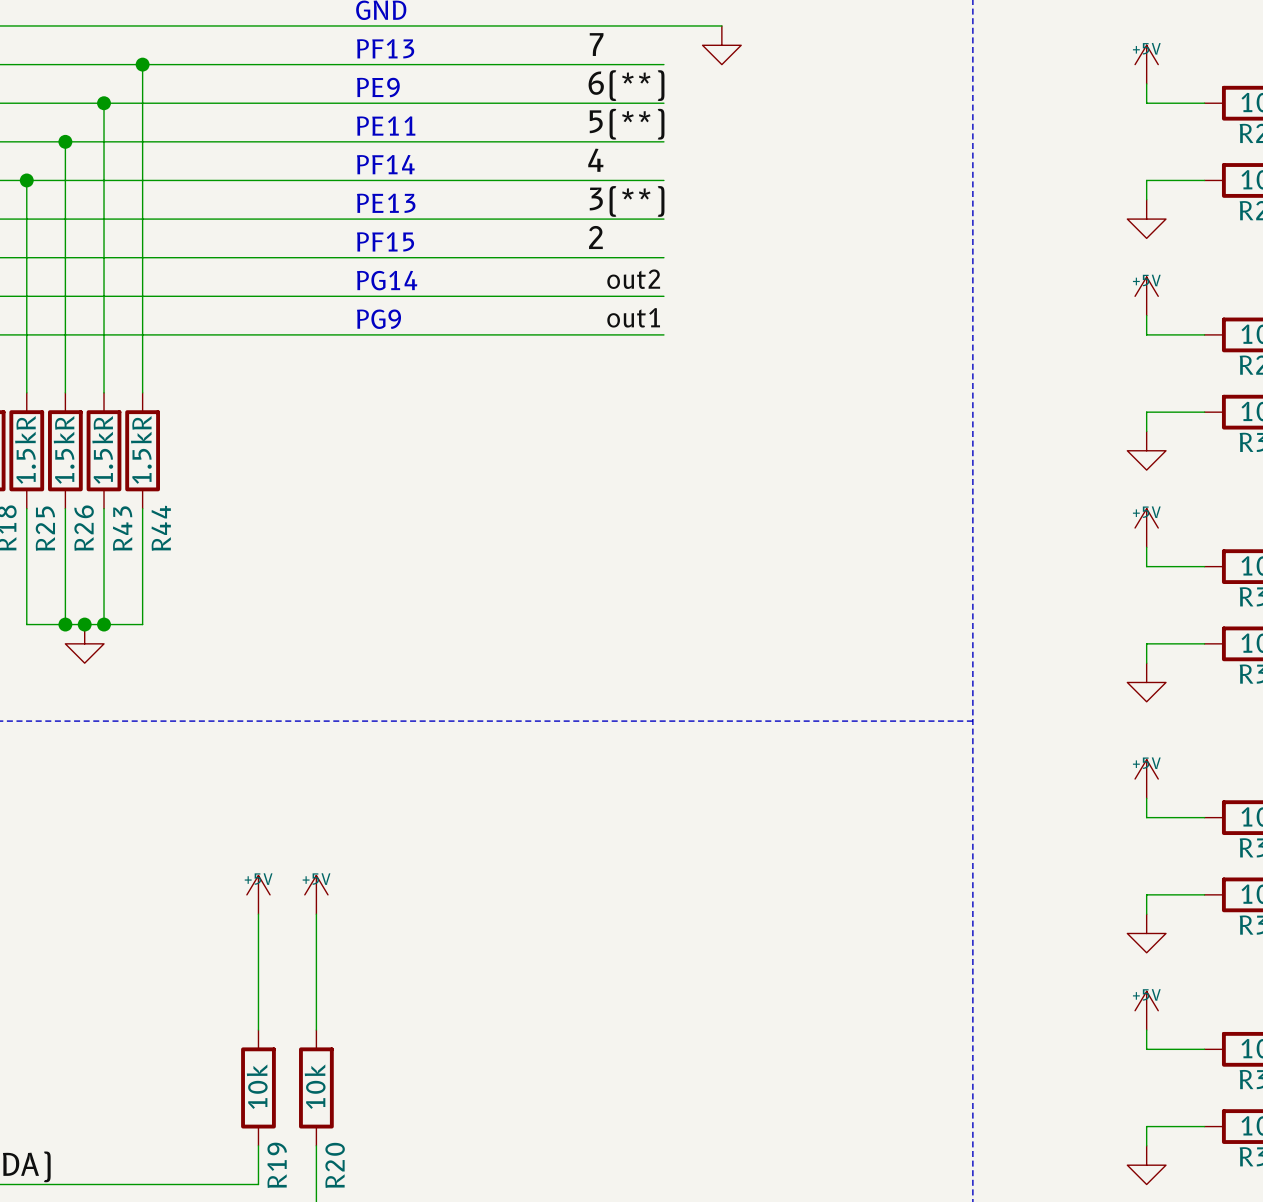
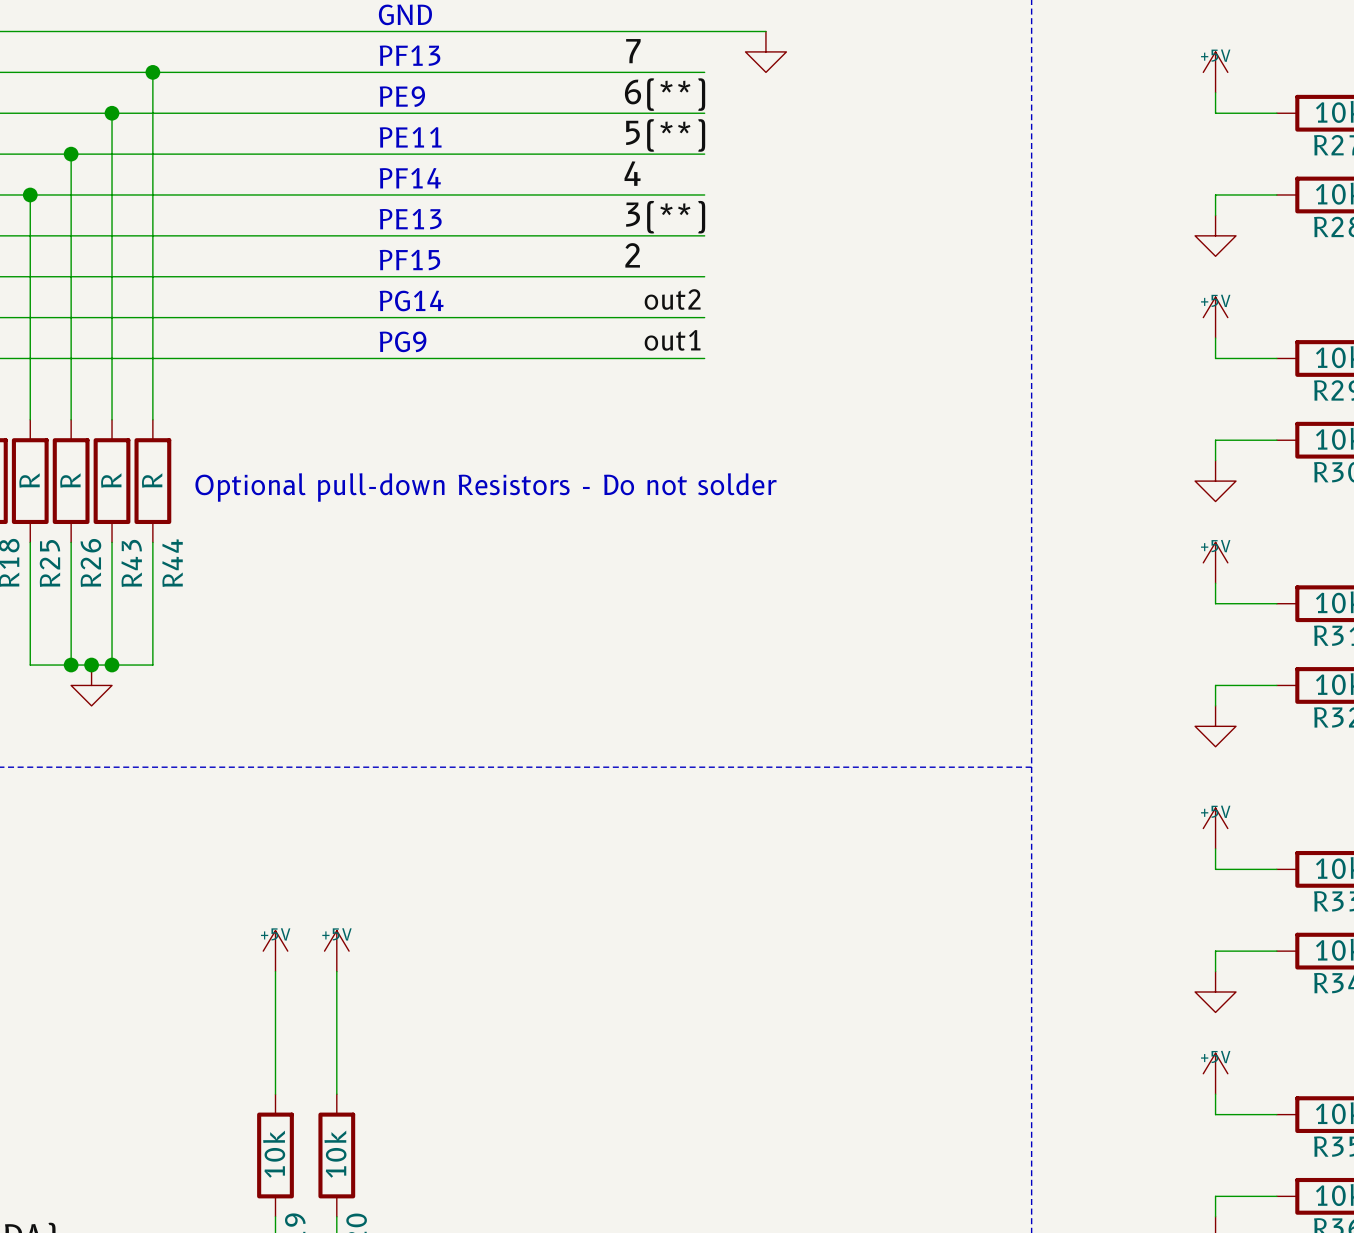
R25 value: 1.5kR (25, 449) -> R (29, 480)
R26 value: 1.5kR (64, 449) -> R (70, 480)
R43 value: 1.5kR (102, 449) -> R (111, 480)
R44 value: 1.5kR (141, 449) -> R (152, 480)
text: none -> Optional pull-down Resistors - Do not solder (486, 487)

